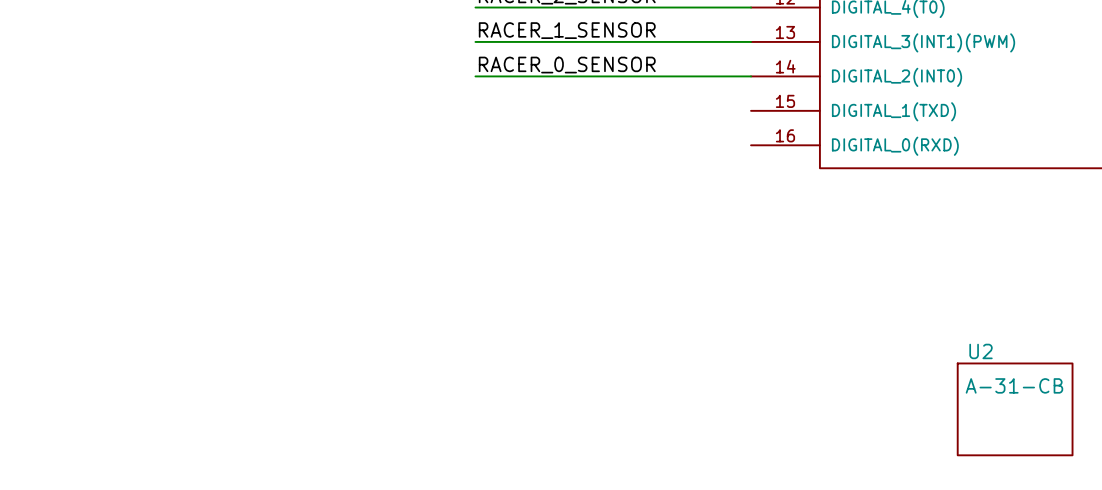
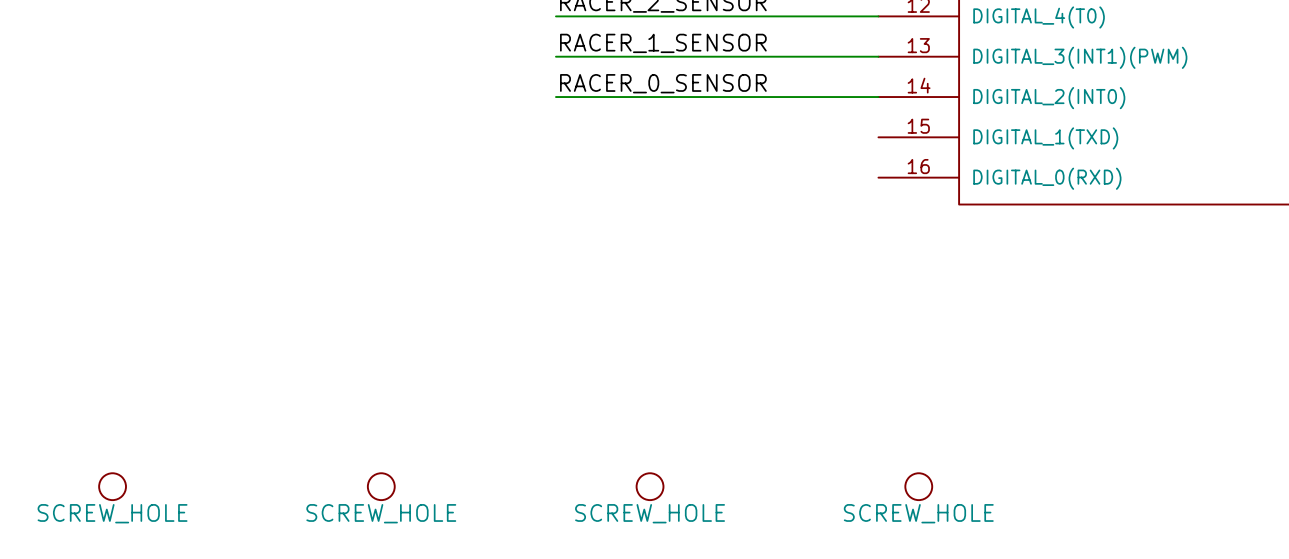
part: none -> SCREW_HOLE (112, 486)
part: none -> SCREW_HOLE (381, 486)
part: none -> SCREW_HOLE (650, 486)
part: none -> SCREW_HOLE (918, 486)
U2: A-31-CB (1015, 409) -> none

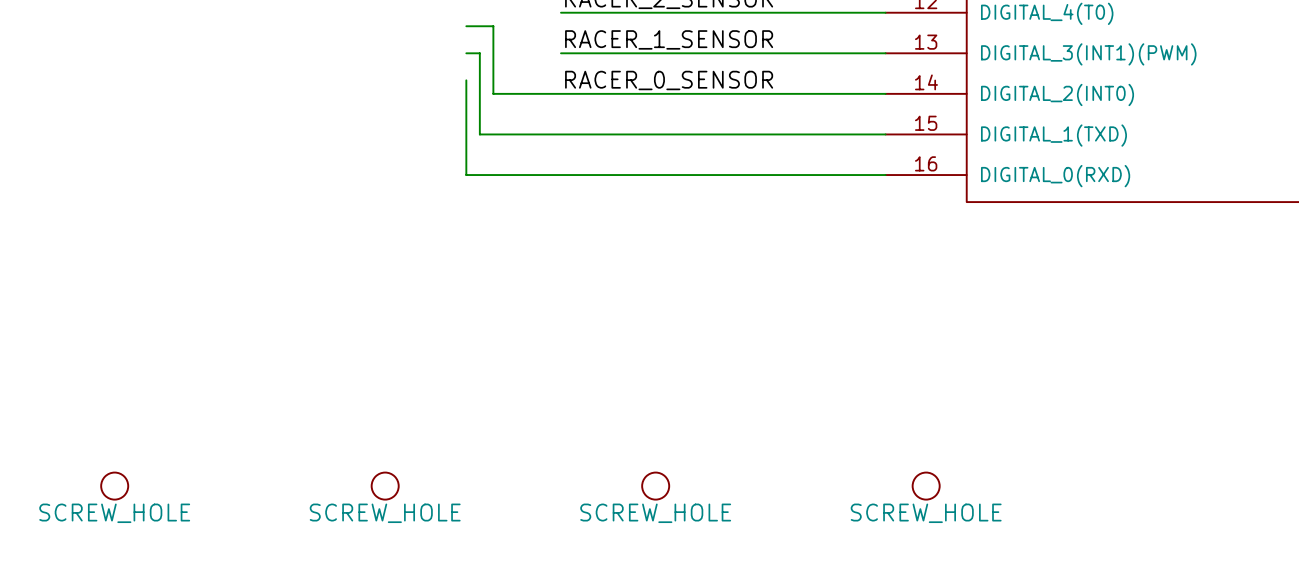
wire: none -> (466, 26) (493, 26) (493, 93) (561, 93)
wire: none -> (466, 53) (479, 53) (479, 134) (885, 134)
wire: none -> (466, 80) (466, 175) (885, 175)

